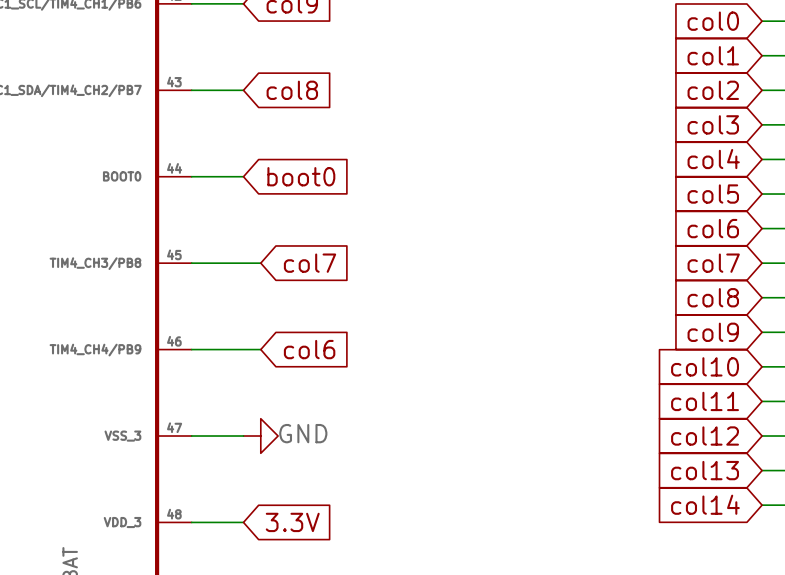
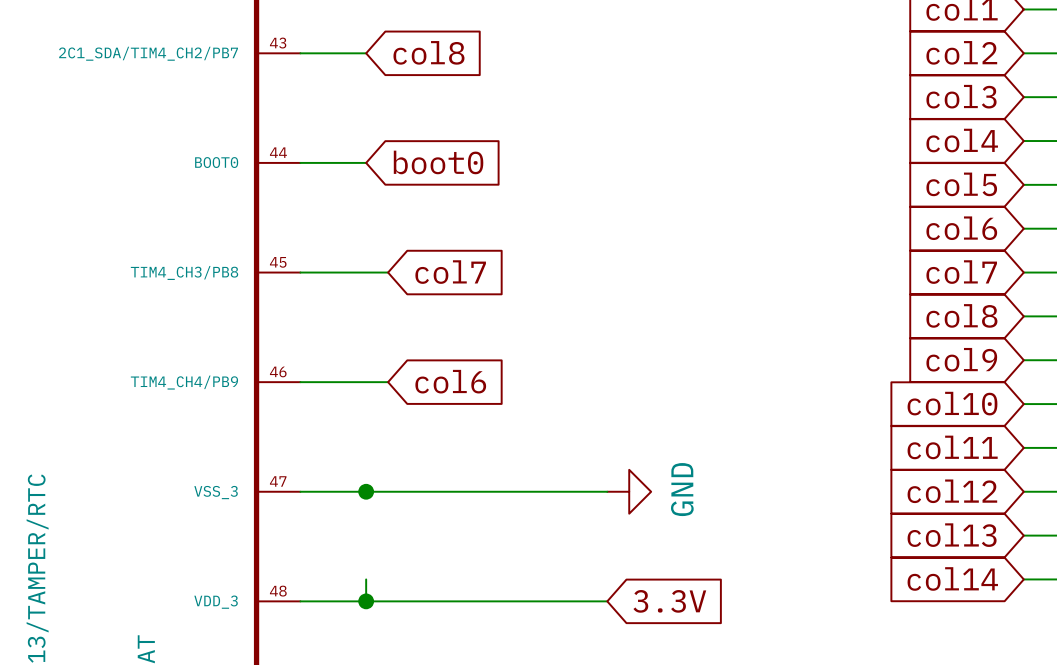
power symbol text rotation: 0° (303, 433) -> 90° counterclockwise (682, 489)
wire: none -> (366, 491) (607, 491)
junction: none -> (366, 491)
power symbol position: GND (260, 436) -> GND (629, 491)
wire: none -> (366, 579) (366, 601) (607, 601)
junction: none -> (366, 601)
global label position: 3.3V (292, 522) -> 3.3V (669, 601)

